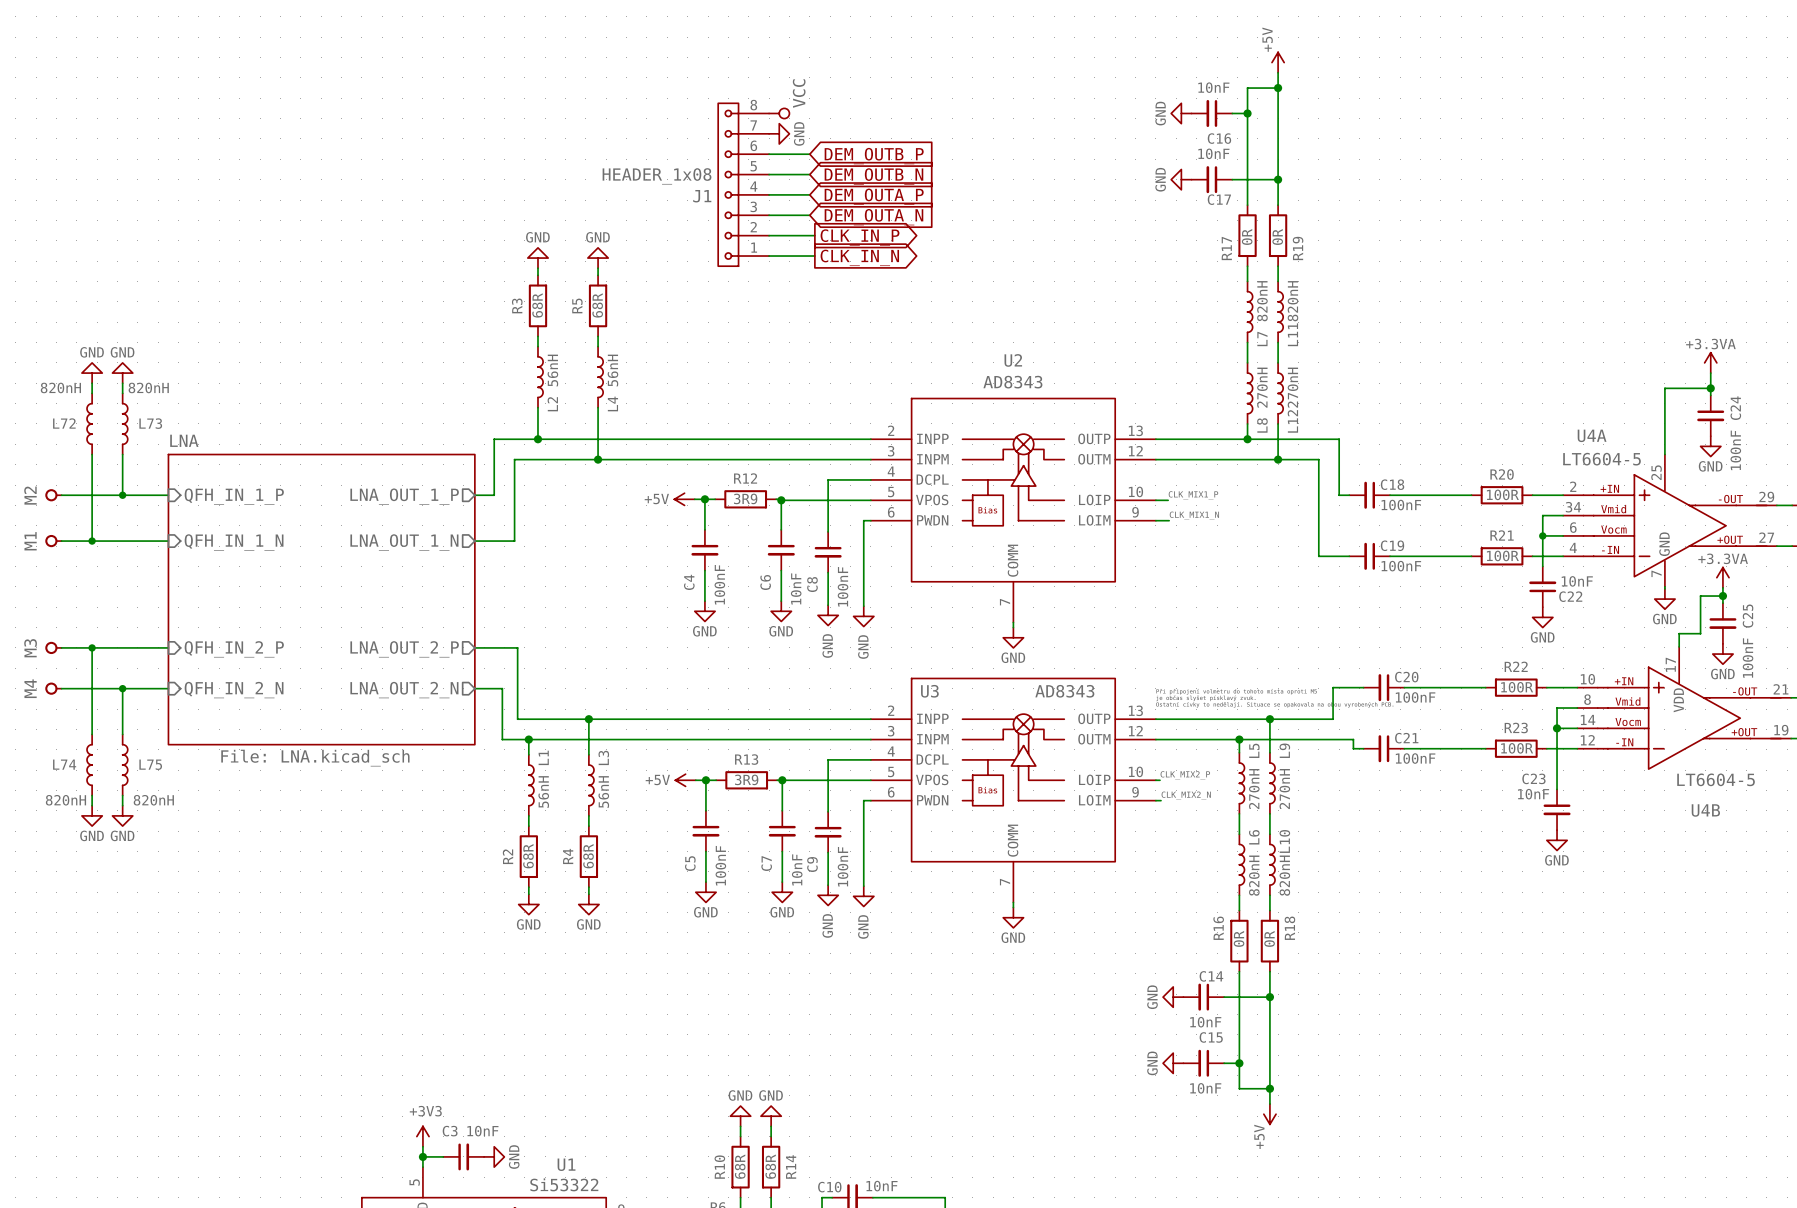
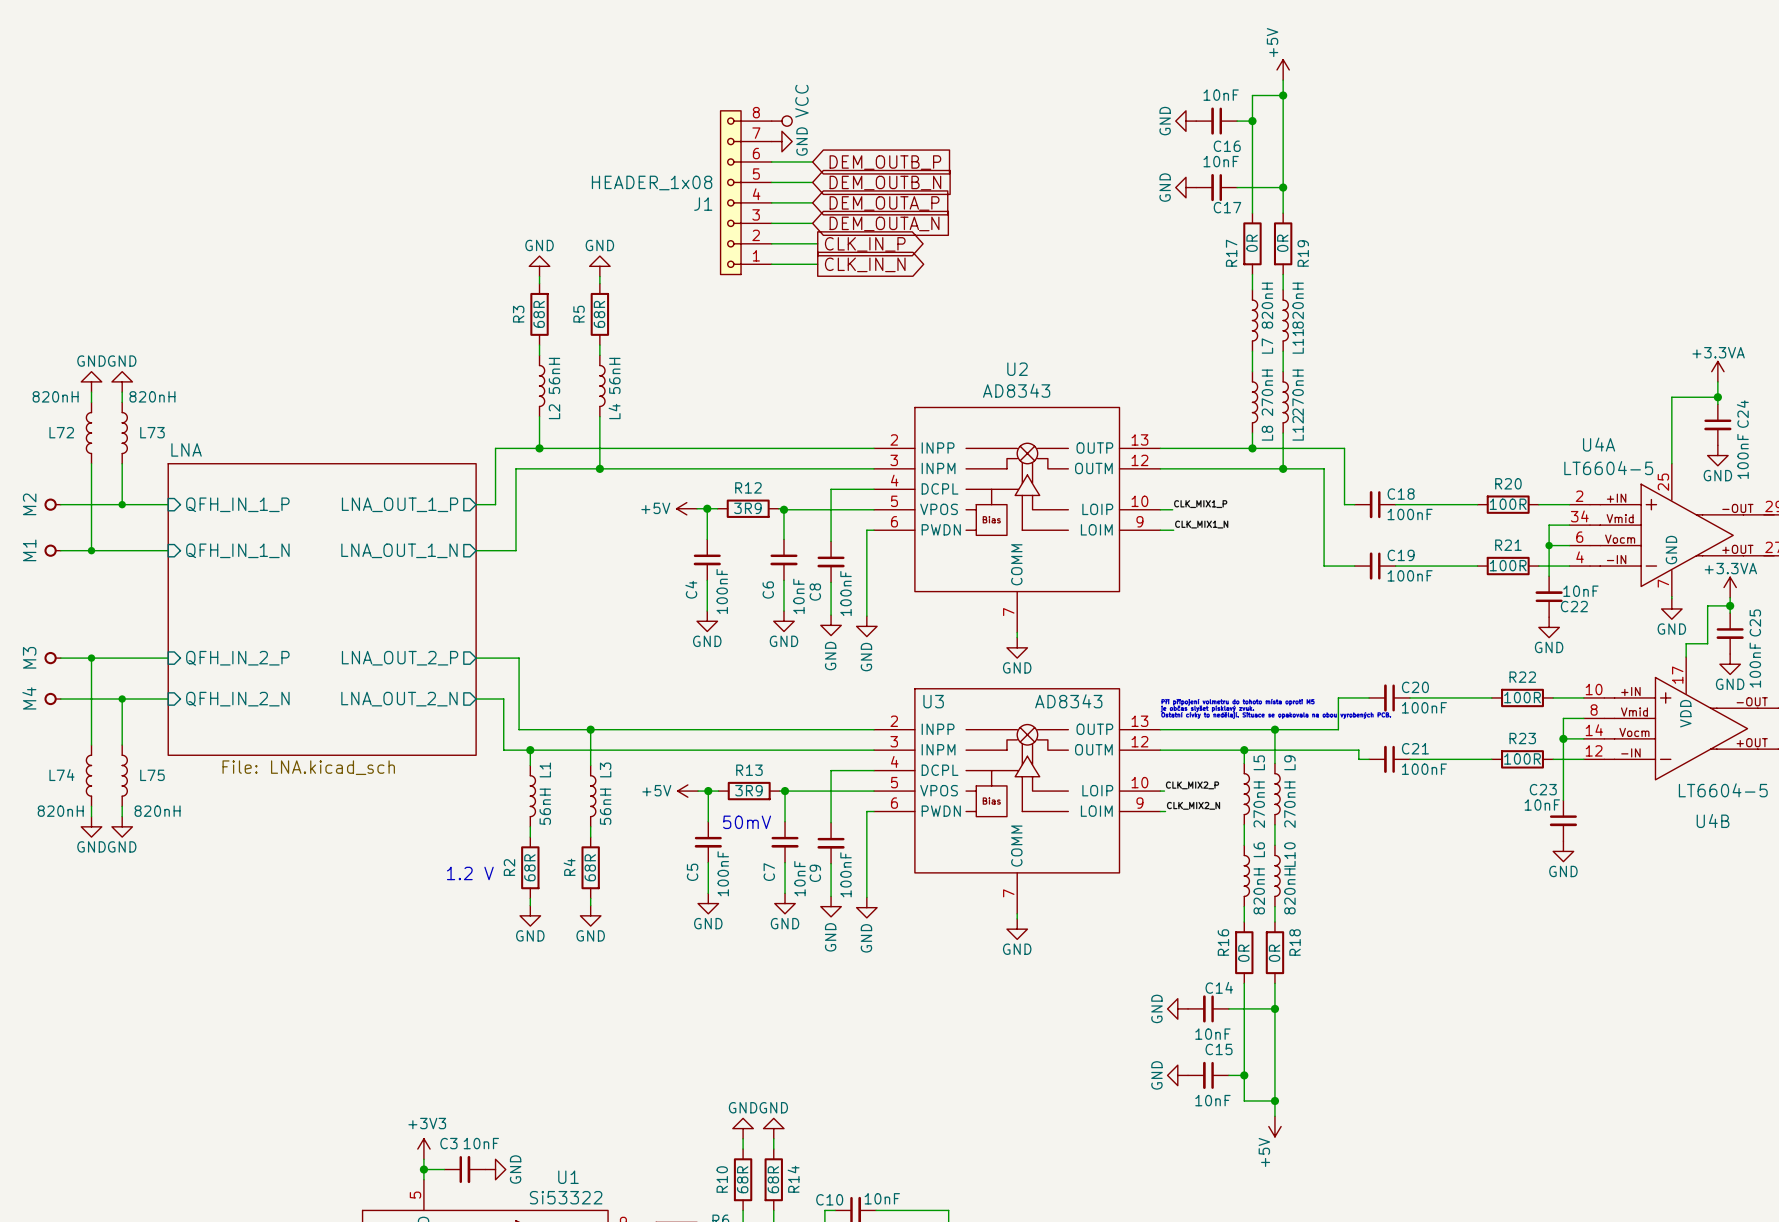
text: none -> 50mV (747, 822)
text: none -> 1.2 V (470, 873)

